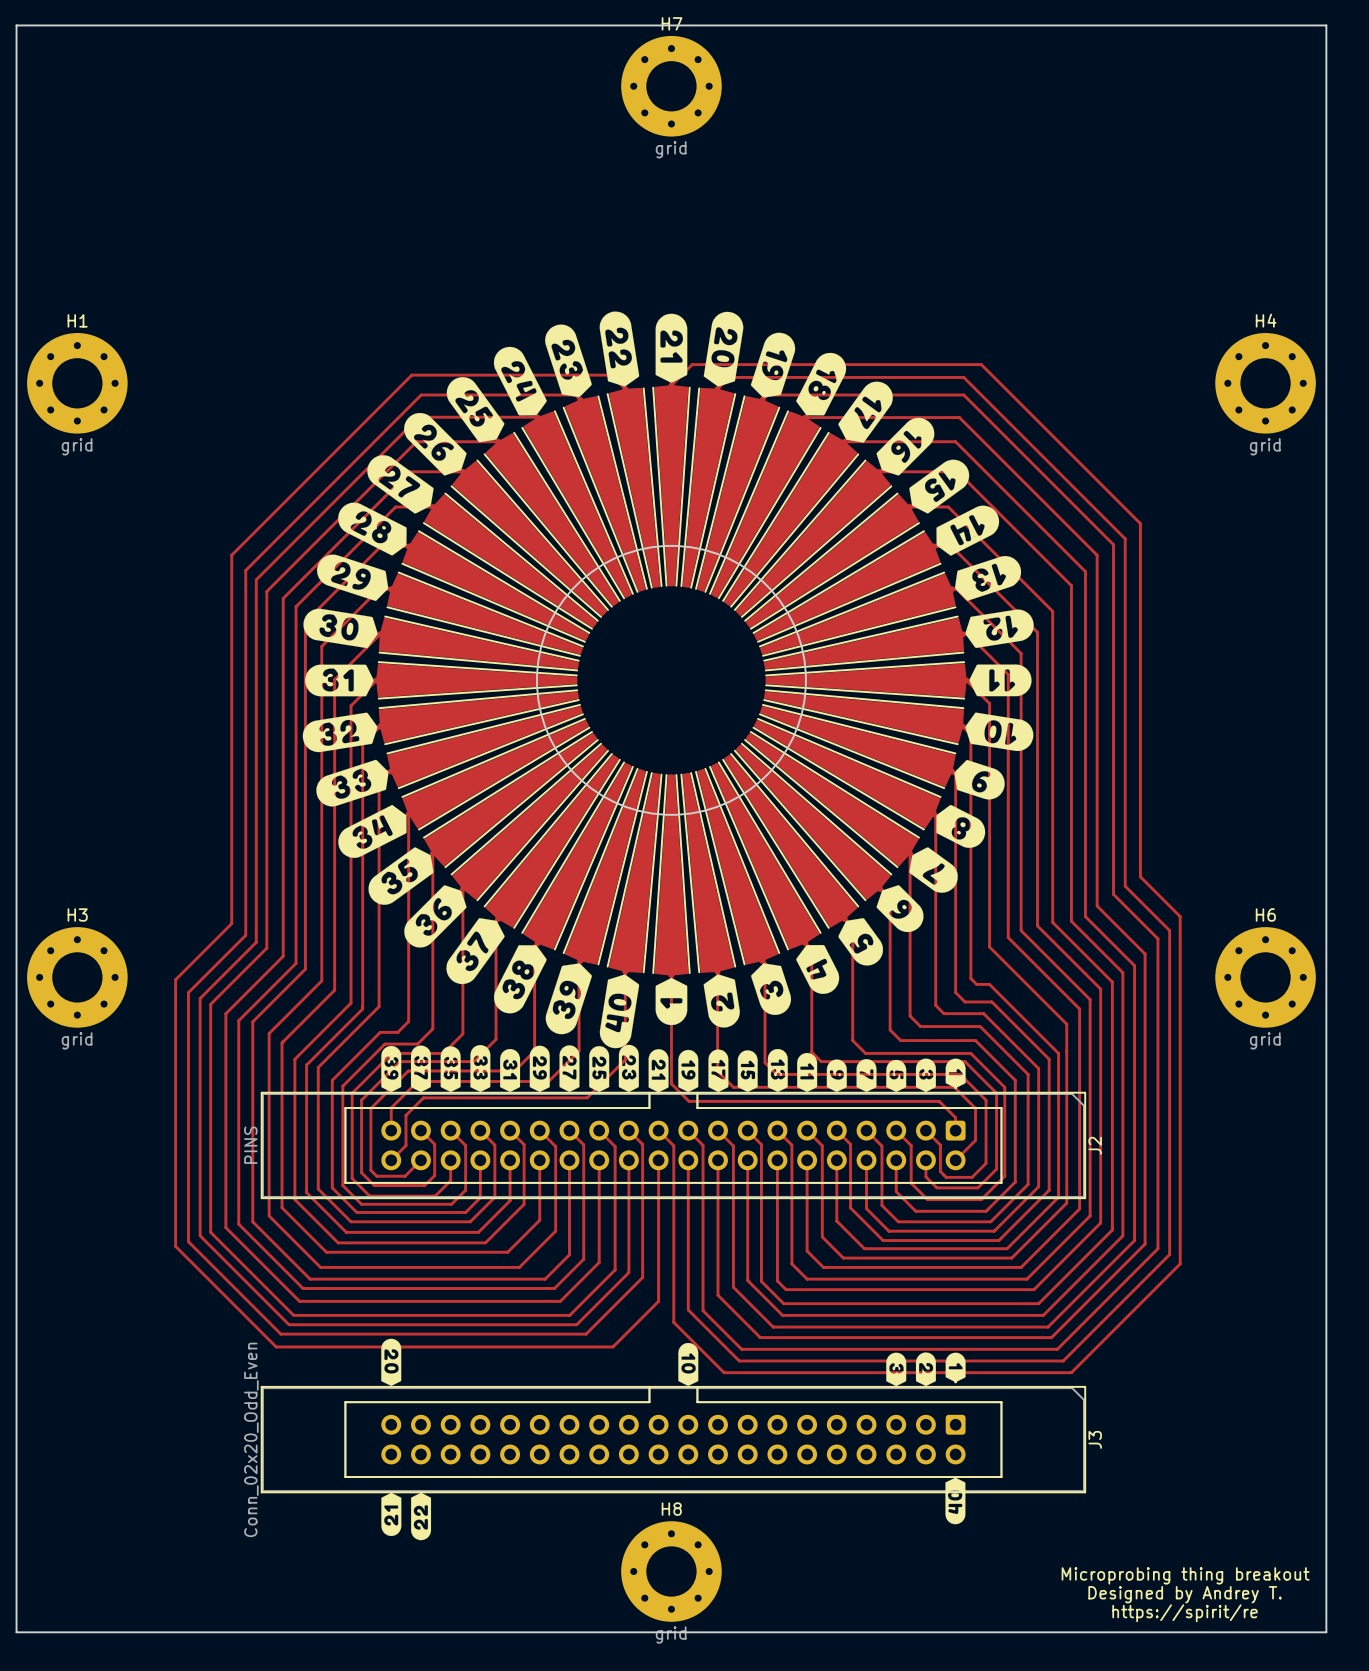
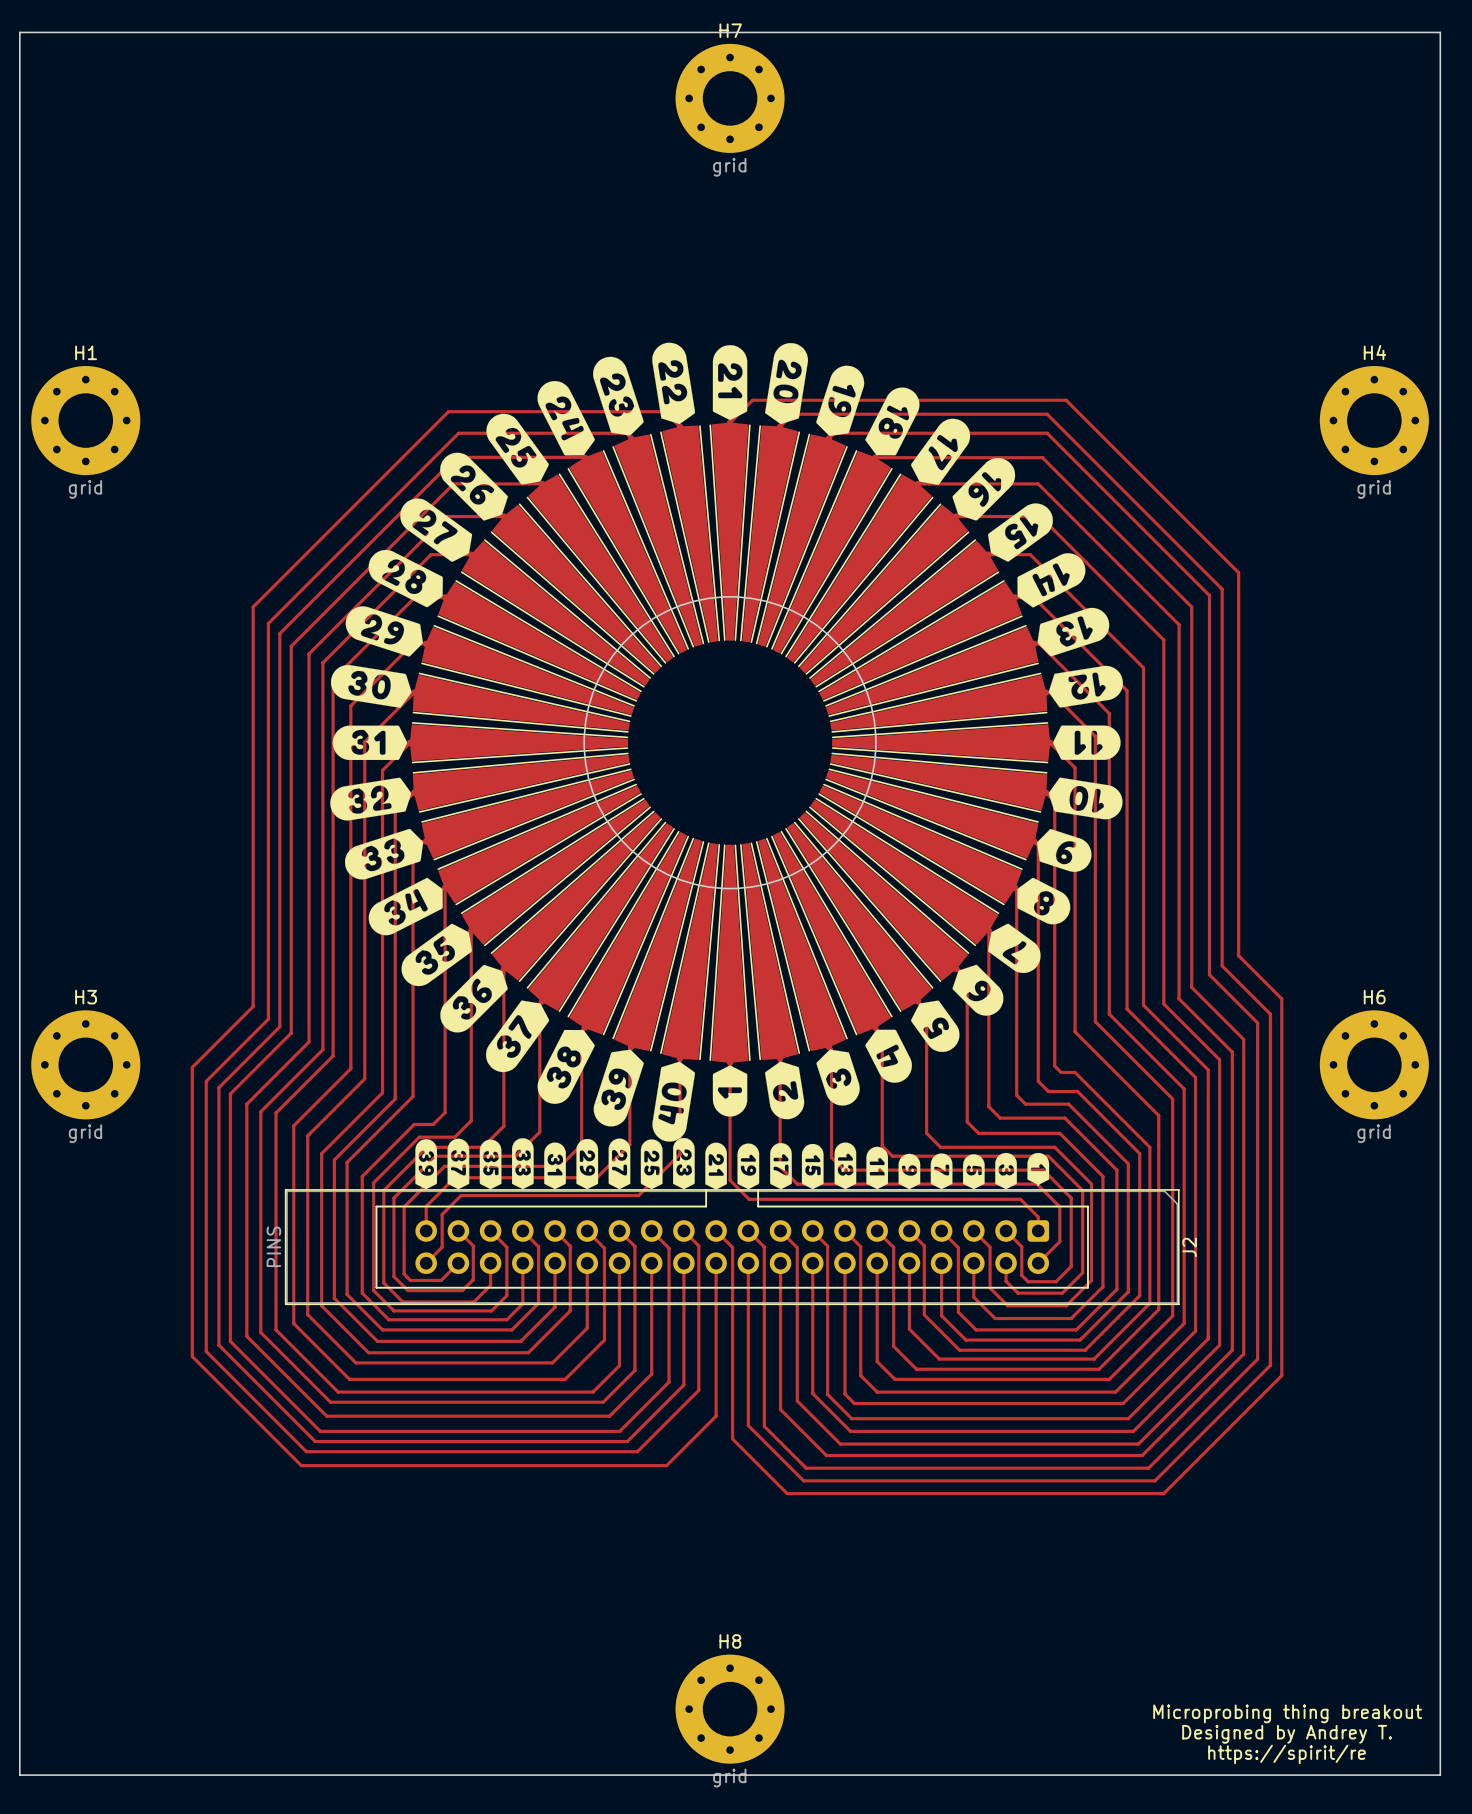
drawing: [381, 1338, 402, 1386] -> none
drawing: [678, 1342, 699, 1386] -> none
drawing: [886, 1352, 966, 1387] -> none
J3: Conn_02x20_Odd_Even (673, 1431) -> none
drawing: [945, 1477, 966, 1525] -> none
drawing: [381, 1492, 432, 1541] -> none

